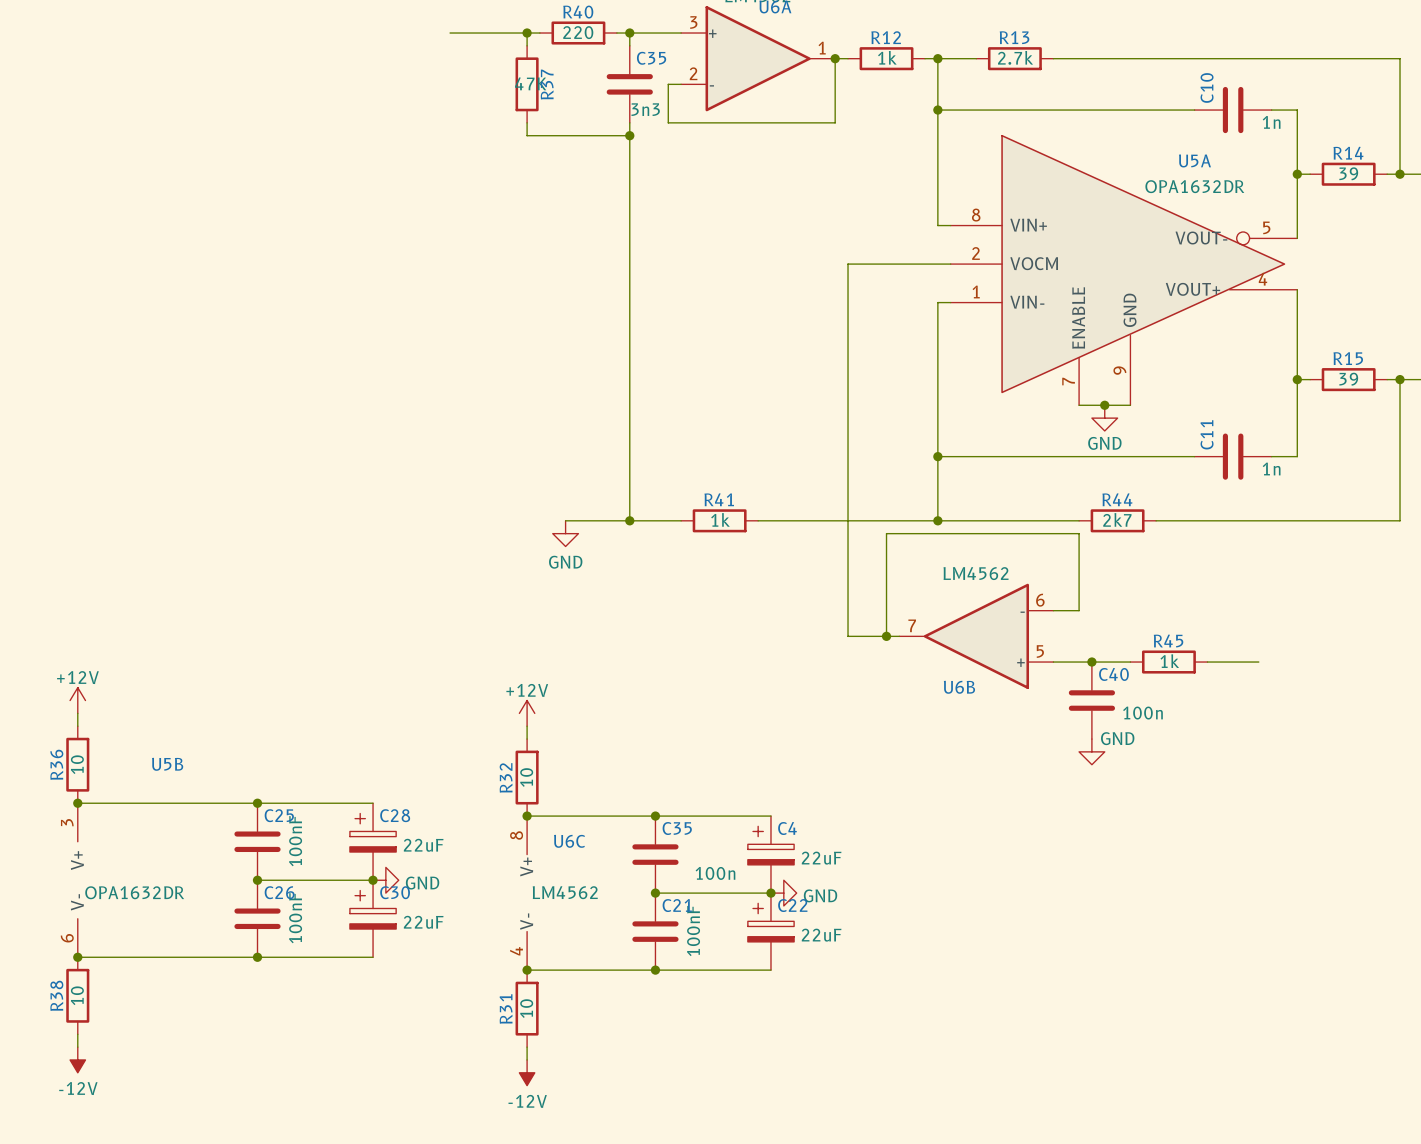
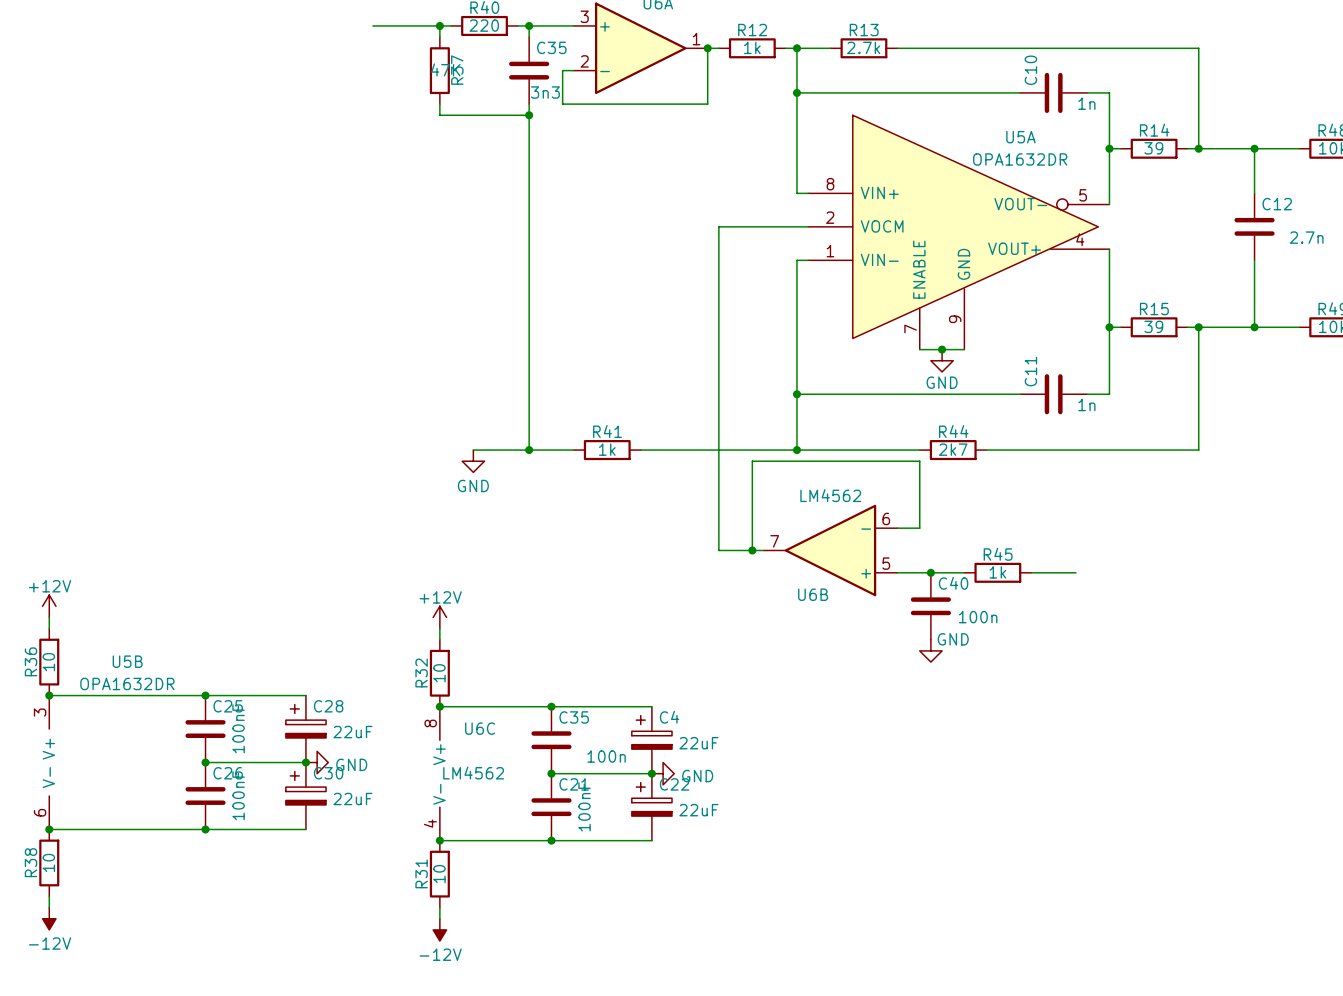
U5B value position: OPA1632DR (134, 892) -> OPA1632DR (127, 683)

